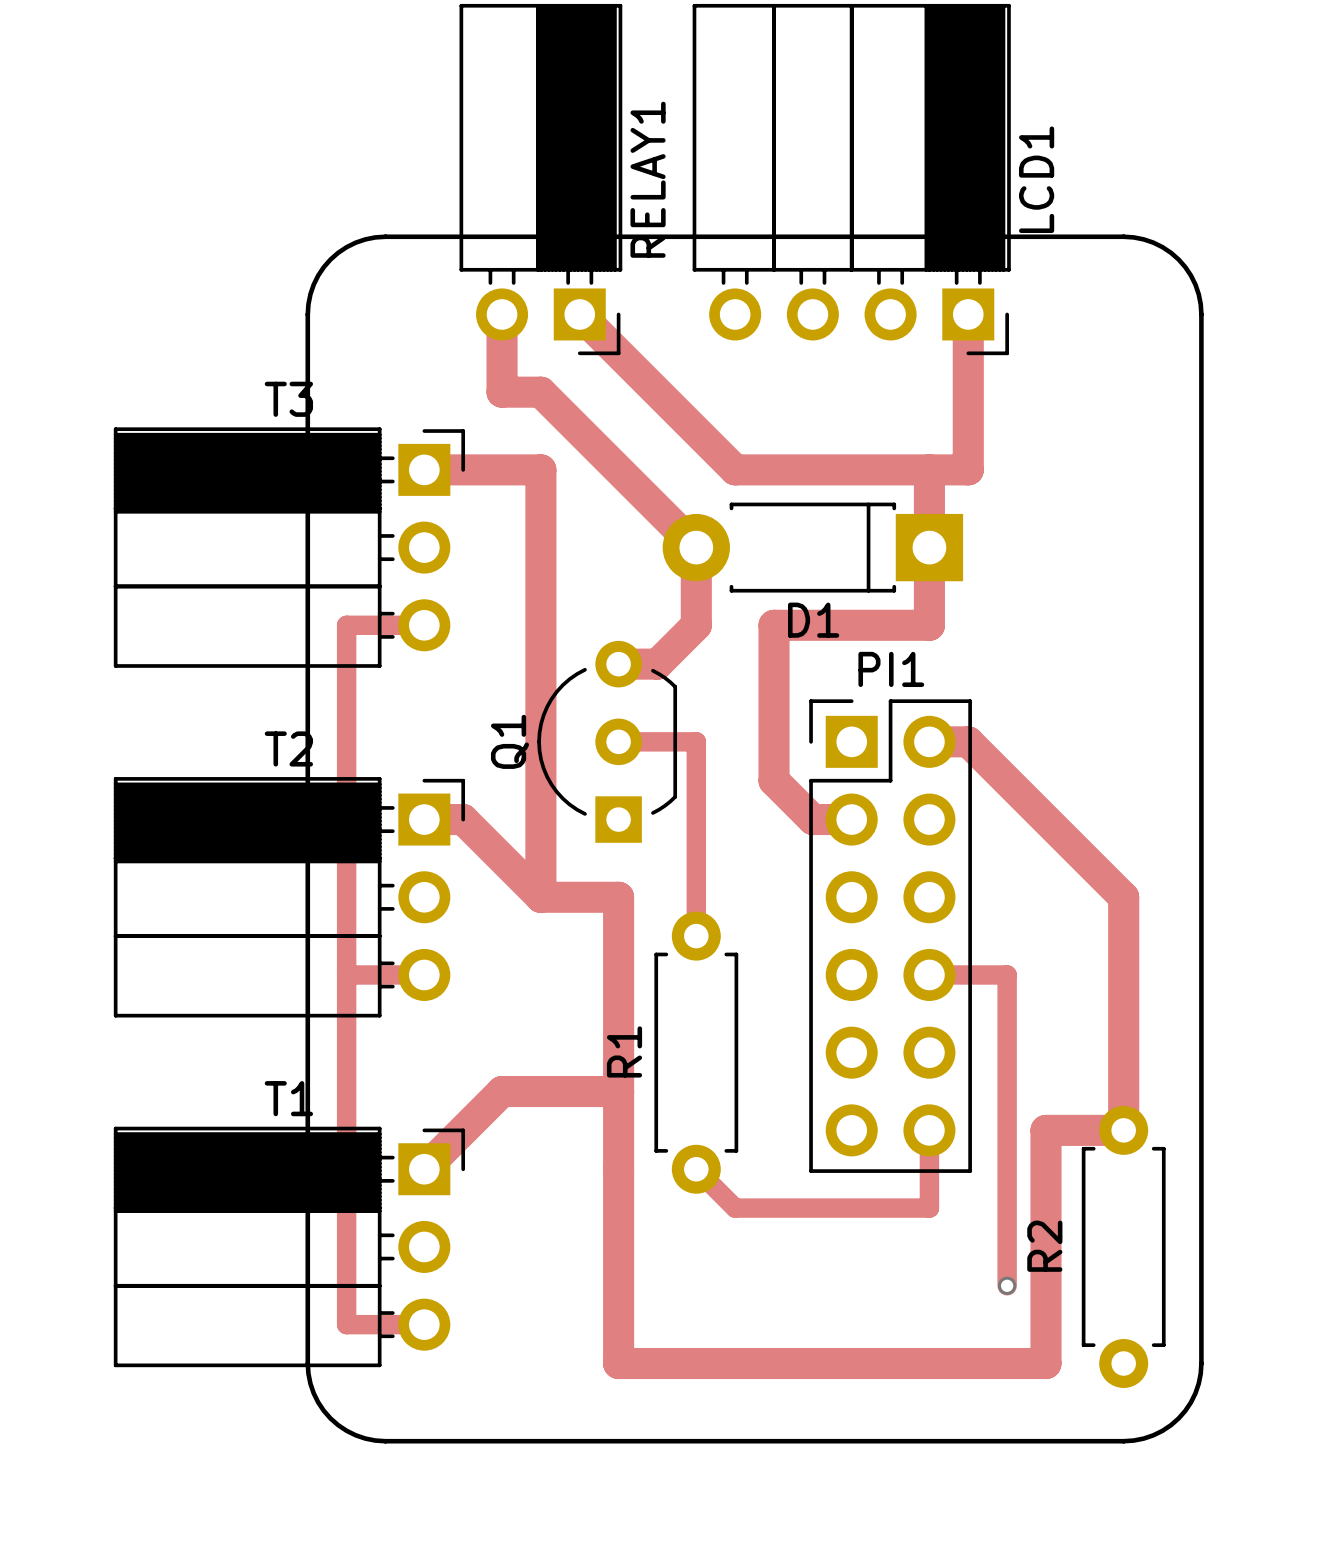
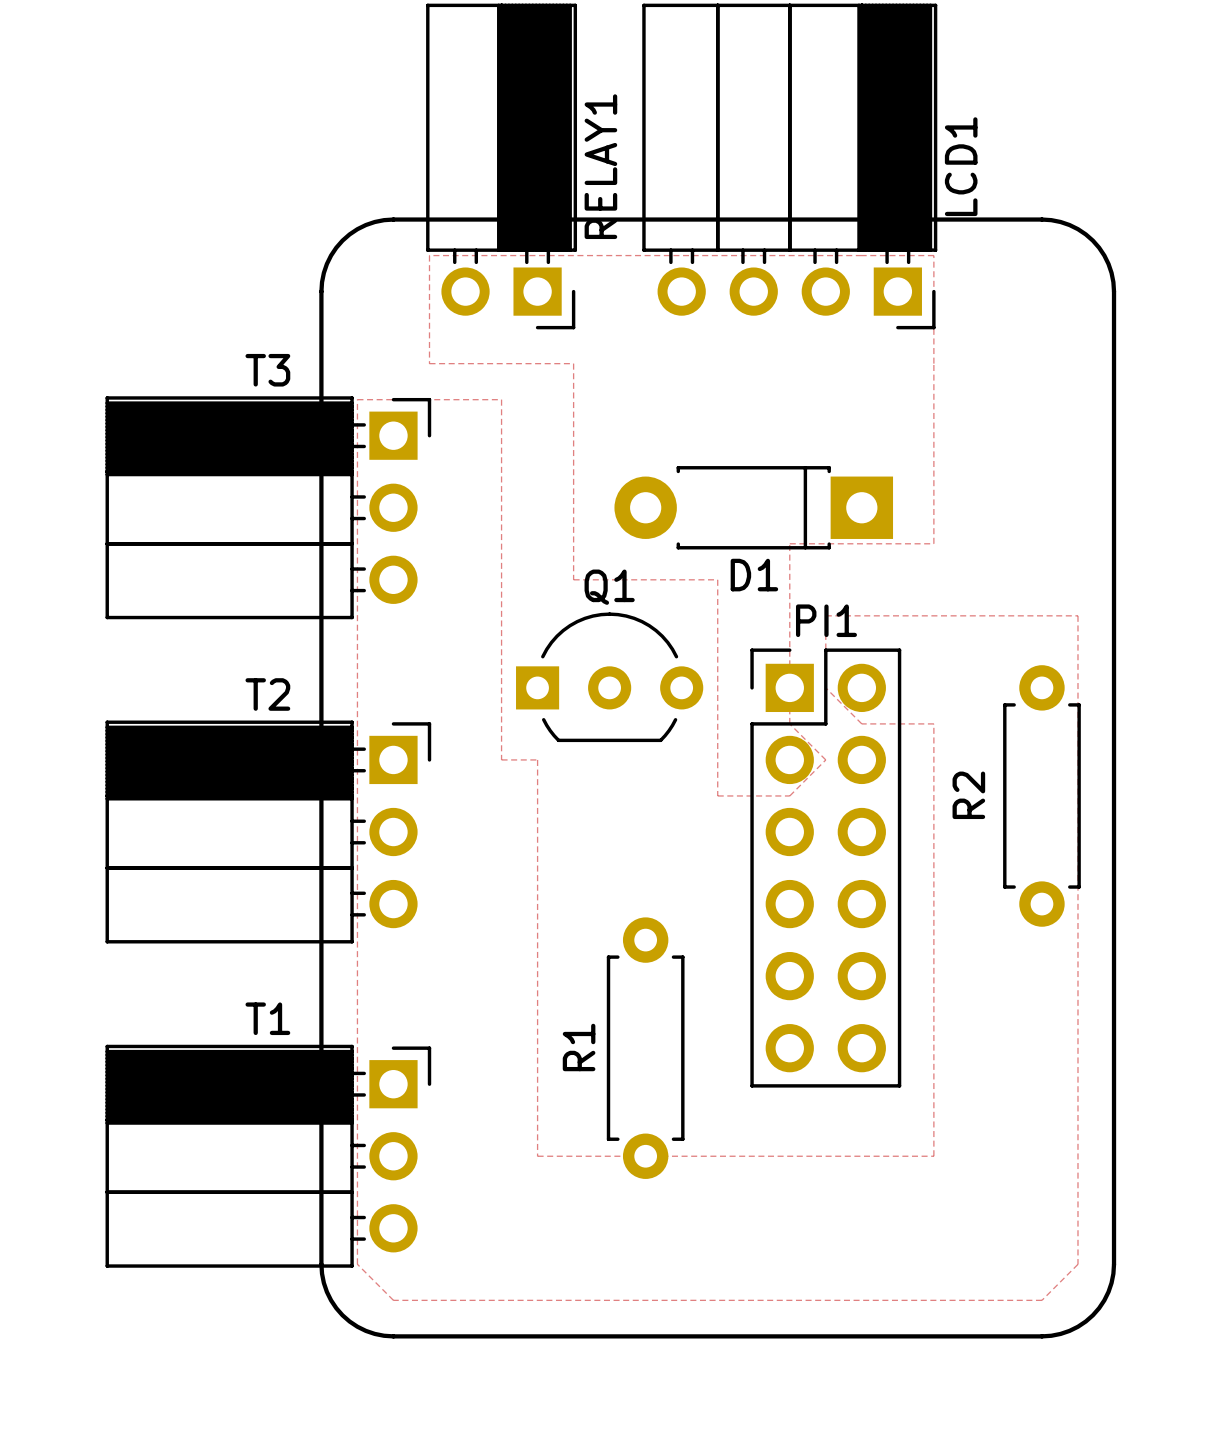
board edge: (424, 236) (375, 237) (346, 247) (330, 259) (318, 275) (310, 294) (307, 314) (308, 1373) (318, 1402) (330, 1418) (346, 1430) (375, 1440) (424, 1441) -> (393, 219) (365, 225) (342, 240) (326, 264) (321, 291) (322, 1273) (331, 1300) (349, 1321) (374, 1333) (393, 1336)
zone outline: none -> (429, 255) (933, 255) (933, 543) (789, 543) (789, 723) (825, 759) (789, 795) (717, 795) (717, 579) (573, 579) (573, 363) (429, 363) (429, 255)
track: (502, 314) (502, 392) (540, 392) (696, 547) (696, 625) (657, 664) (618, 664) -> none
track: (579, 314) (735, 469) (968, 469) (968, 314) -> none
zone outline: none -> (357, 399) (357, 1264) (393, 1300) (1041, 1300) (1077, 1264) (1077, 615) (825, 615) (825, 687) (861, 723) (933, 723) (933, 1156) (537, 1156) (537, 759) (501, 759) (501, 399) (357, 399)
track: (424, 469) (540, 469) (540, 897) -> none
track: (929, 469) (929, 625) (774, 625) (774, 780) (812, 819) (851, 819) -> none
track: (424, 625) (346, 625) (346, 1324) (424, 1324) -> none
Q1 rotation: 0° (607, 741) -> 90° clockwise (609, 677)
track: (618, 741) (696, 741) (696, 936) -> none
track: (929, 741) (968, 741) (1123, 897) (1123, 1130) (1045, 1130) (1045, 1363) (618, 1363) (618, 897) (540, 897) -> none
track: (424, 819) (463, 819) (540, 897) -> none
track: (346, 974) (424, 974) -> none
track: (929, 974) (1007, 974) (1007, 1285) -> none
R1 position: (696, 1052) -> (645, 1048)
track: (618, 1091) (502, 1091) (424, 1169) -> none
track: (929, 1130) (929, 1208) (735, 1208) (696, 1169) -> none
R2 position: (1123, 1246) -> (1041, 795)
via: (1007, 1285) -> none

